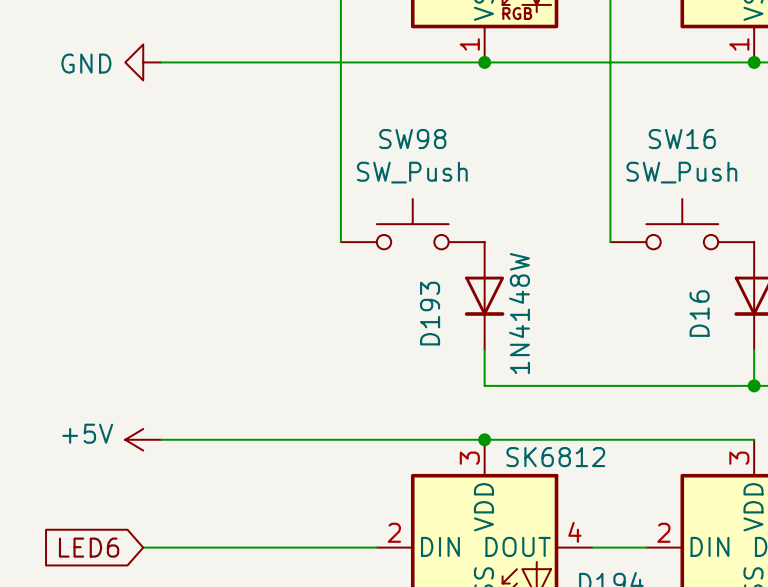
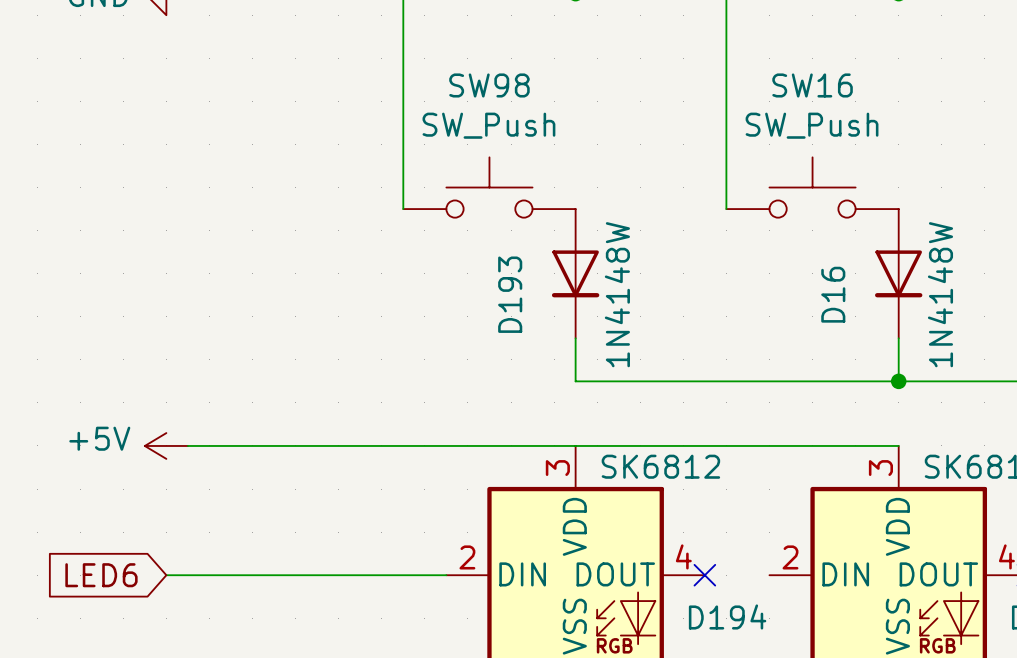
junction: (484, 439) -> none
wire: (592, 547) (646, 547) -> none
no-connect mark: none -> (704, 575)

